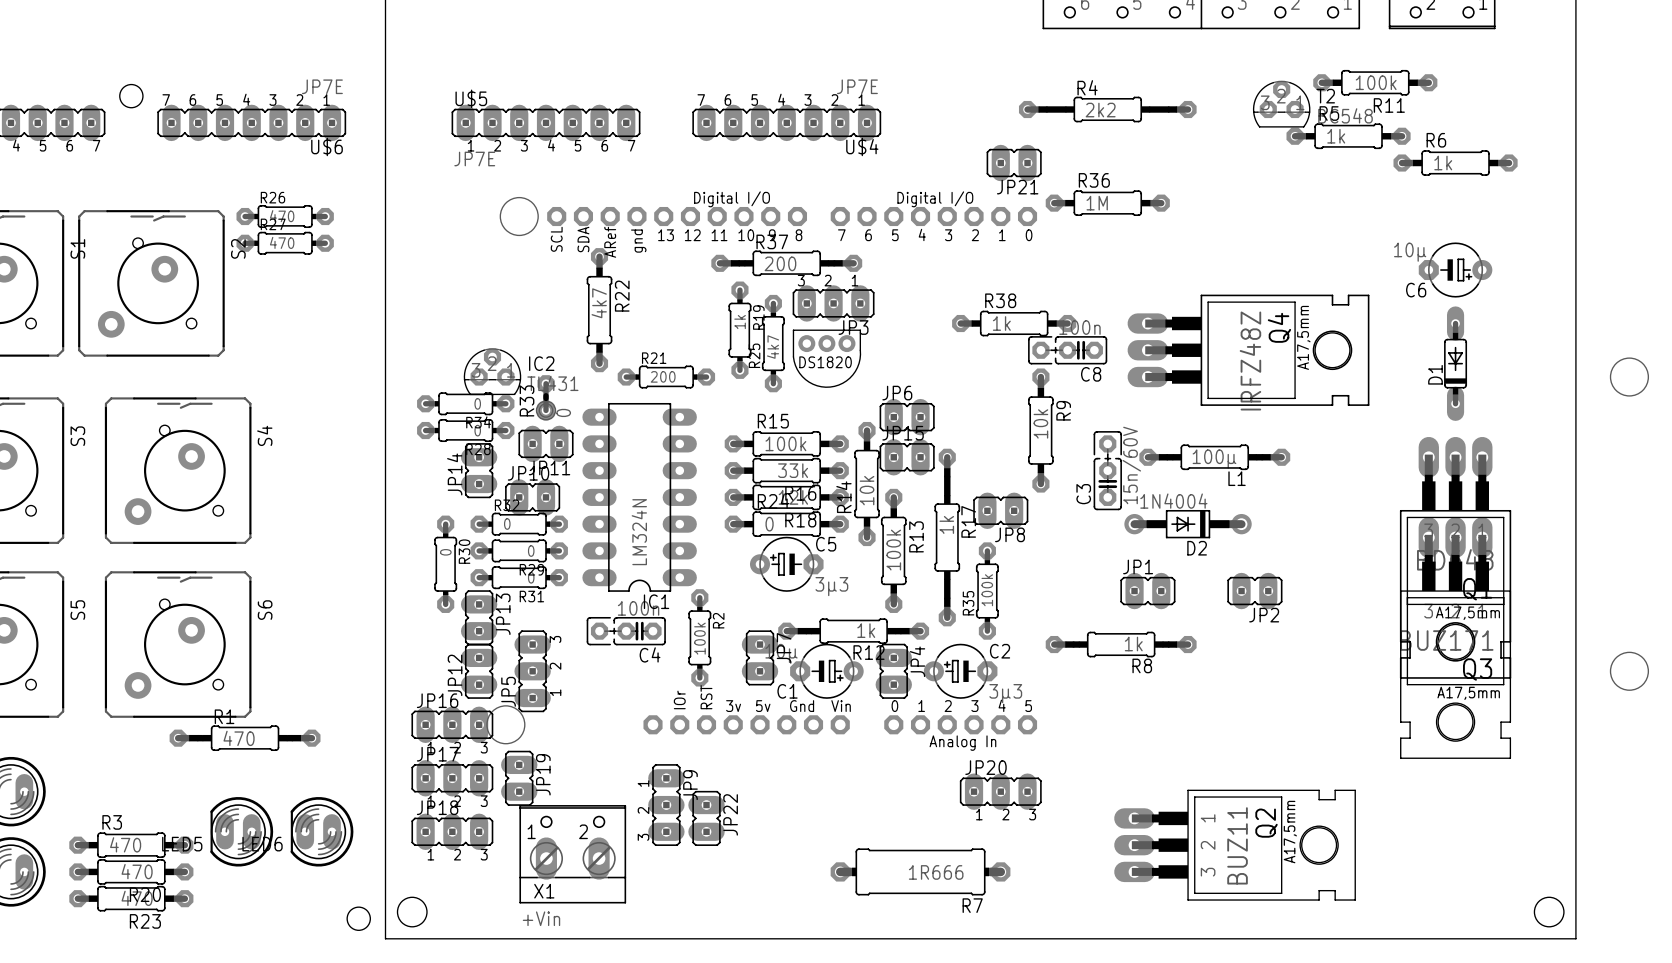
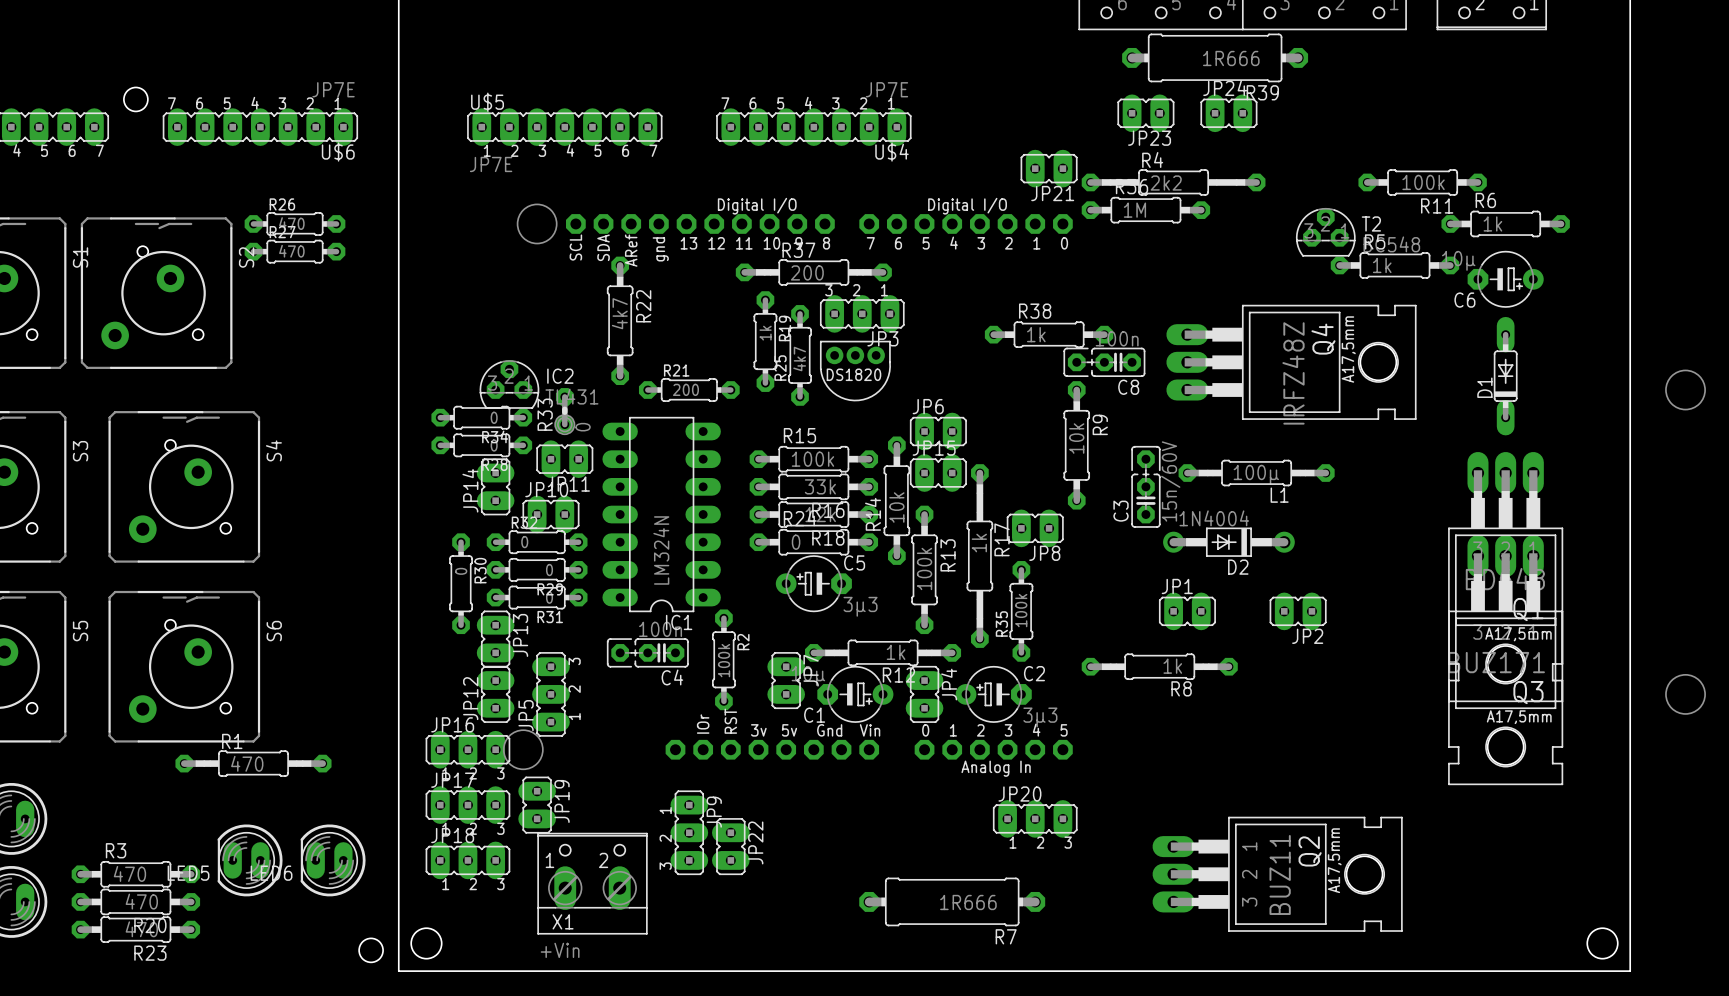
R39: none -> 1R666 (1215, 57)
R11 position: (1375, 82) -> (1422, 182)
T2 position: (1281, 104) -> (1325, 232)
R4 position: (1107, 109) -> (1173, 182)
JP23: none -> (1145, 113)
JP24: none -> (1228, 113)
R5 position: (1348, 136) -> (1394, 265)
R6 position: (1455, 163) -> (1505, 223)

